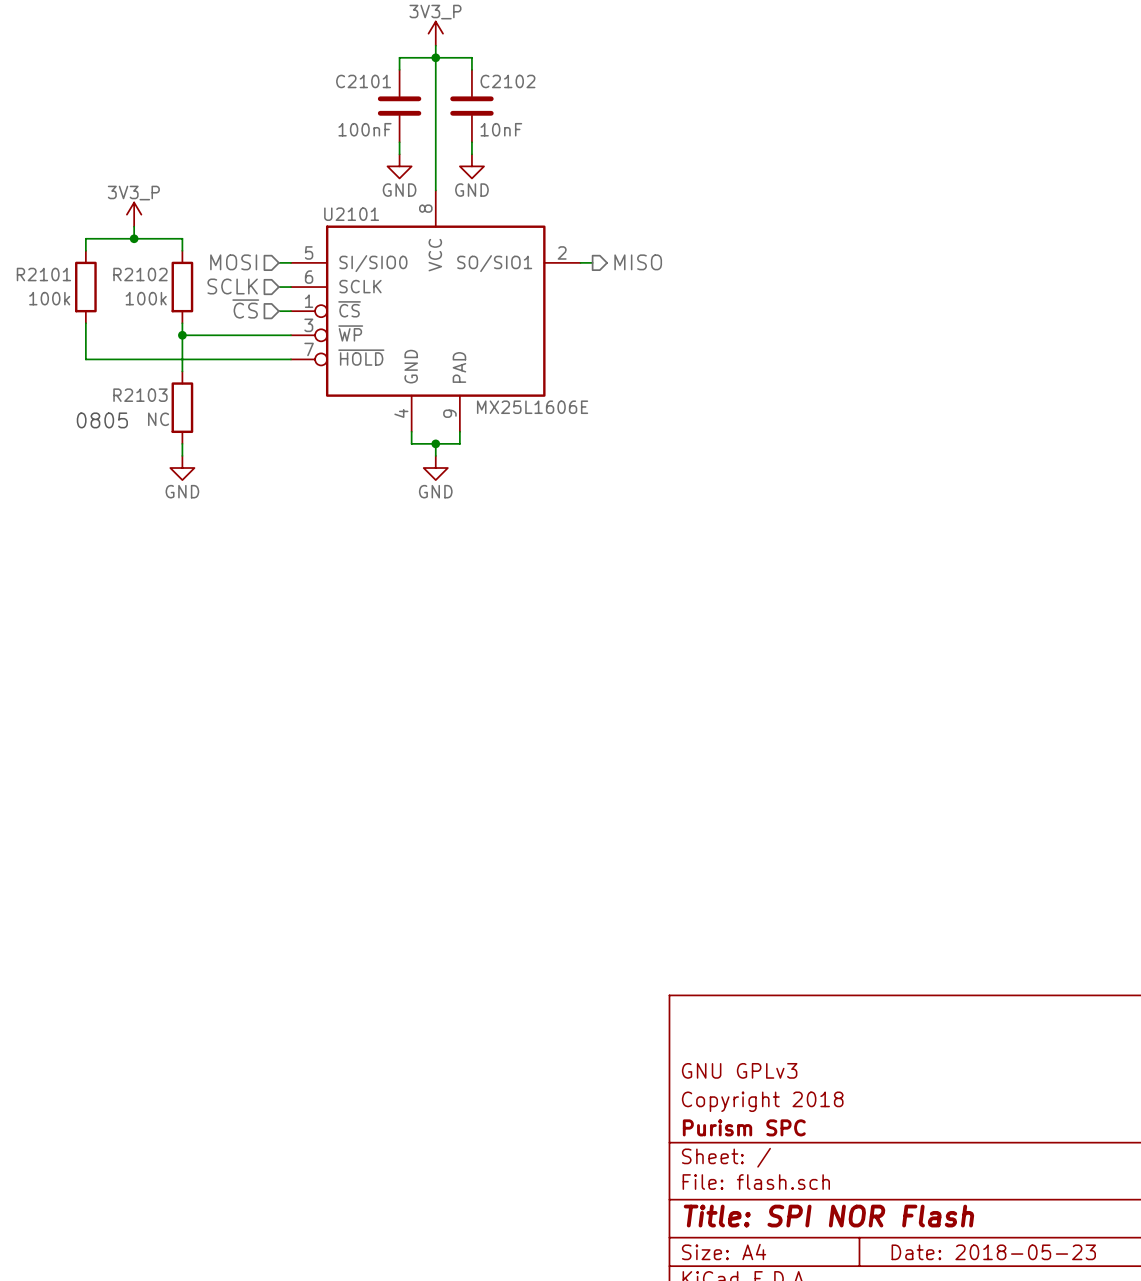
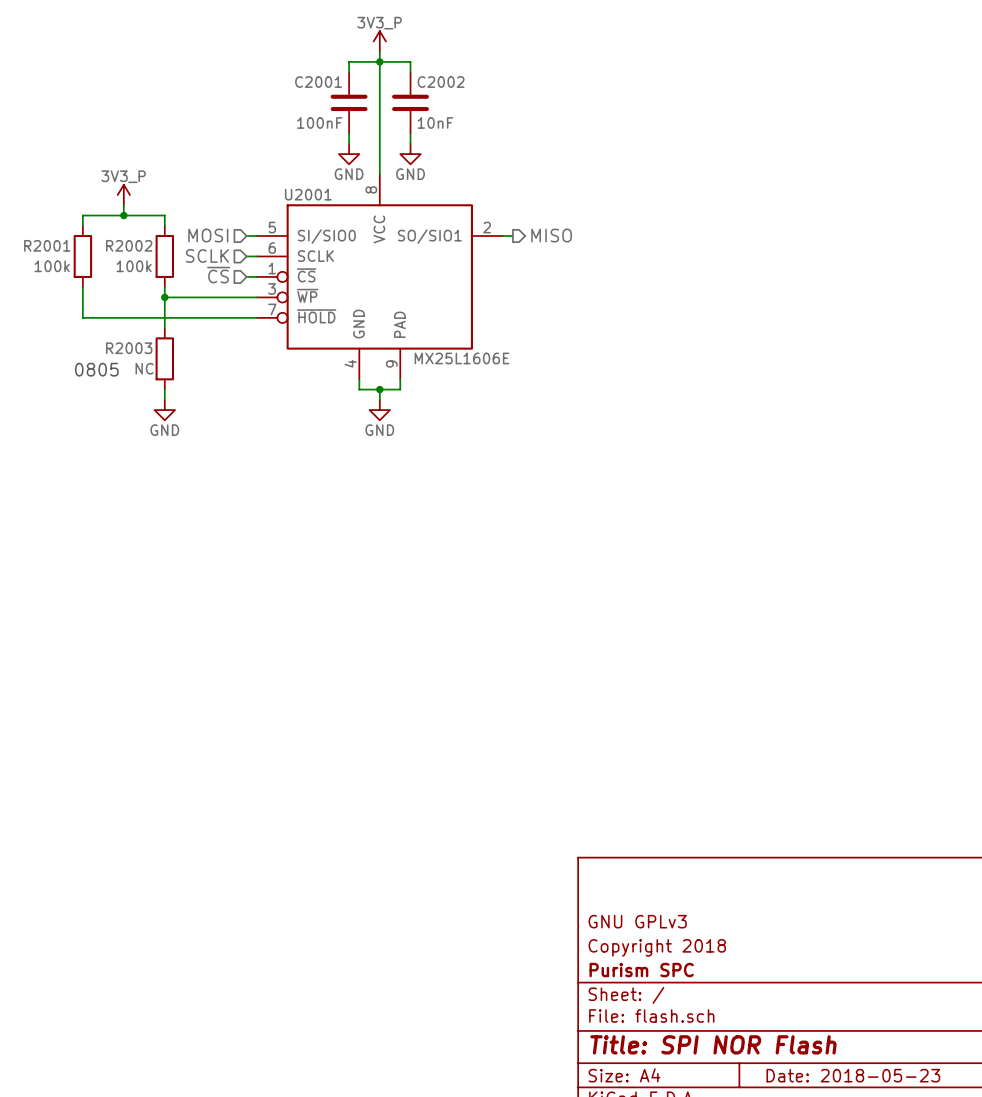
C2101 name: C2101 (363, 81) -> C2001 (318, 82)
C2102 name: C2102 (507, 81) -> C2002 (441, 82)
U2101 name: U2101 (351, 214) -> U2001 (308, 194)
R2101 name: R2101 (43, 274) -> R2001 (47, 245)
R2102 name: R2102 (140, 274) -> R2002 (129, 245)
R2103 name: R2103 (140, 395) -> R2003 (129, 348)

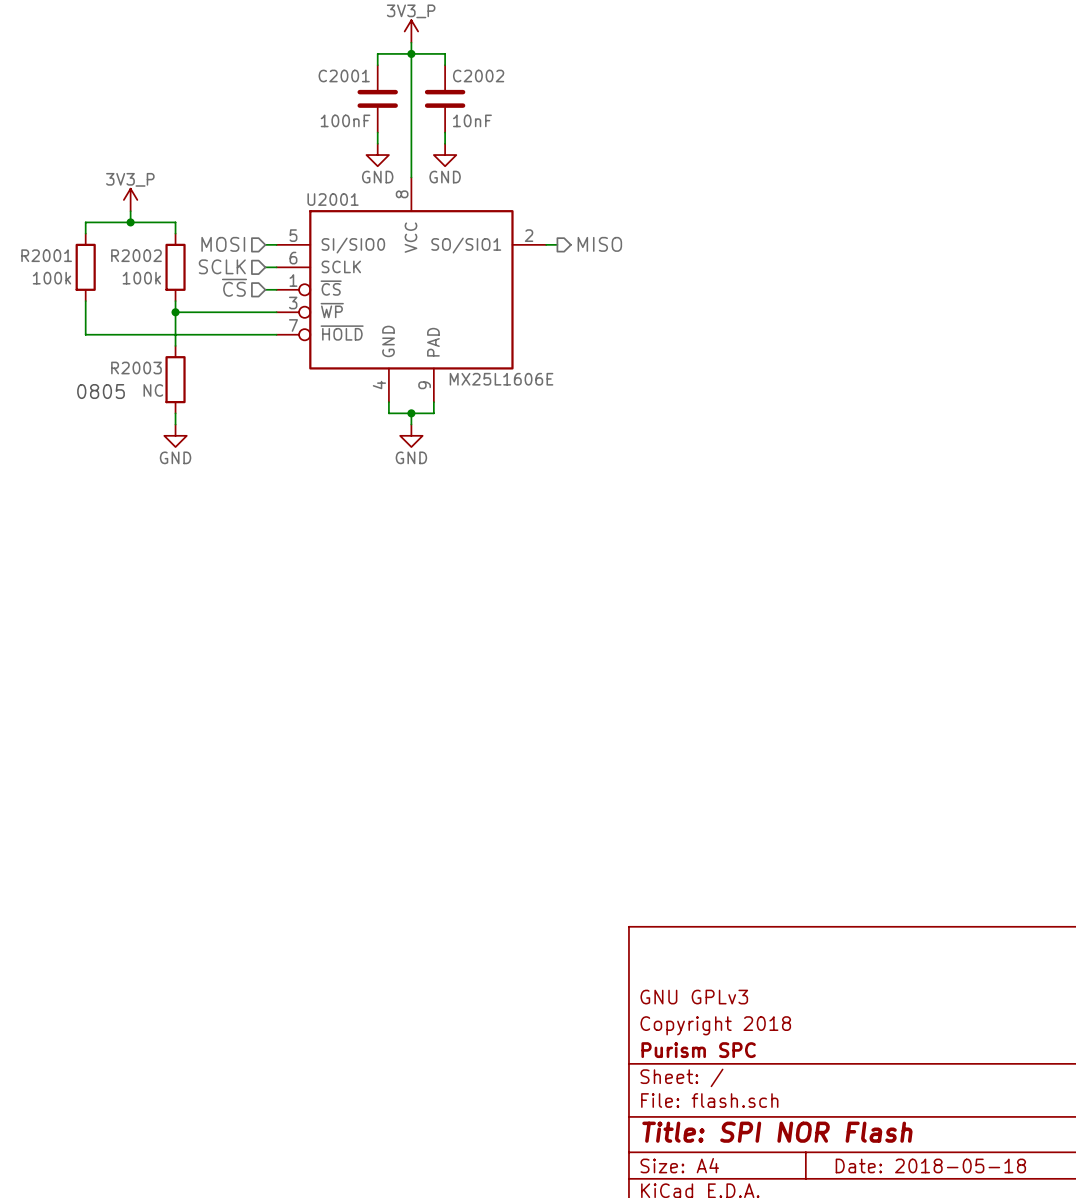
title block: Date: 2018-05-23 (853, 1075) -> Date: 2018-05-18 (930, 1165)

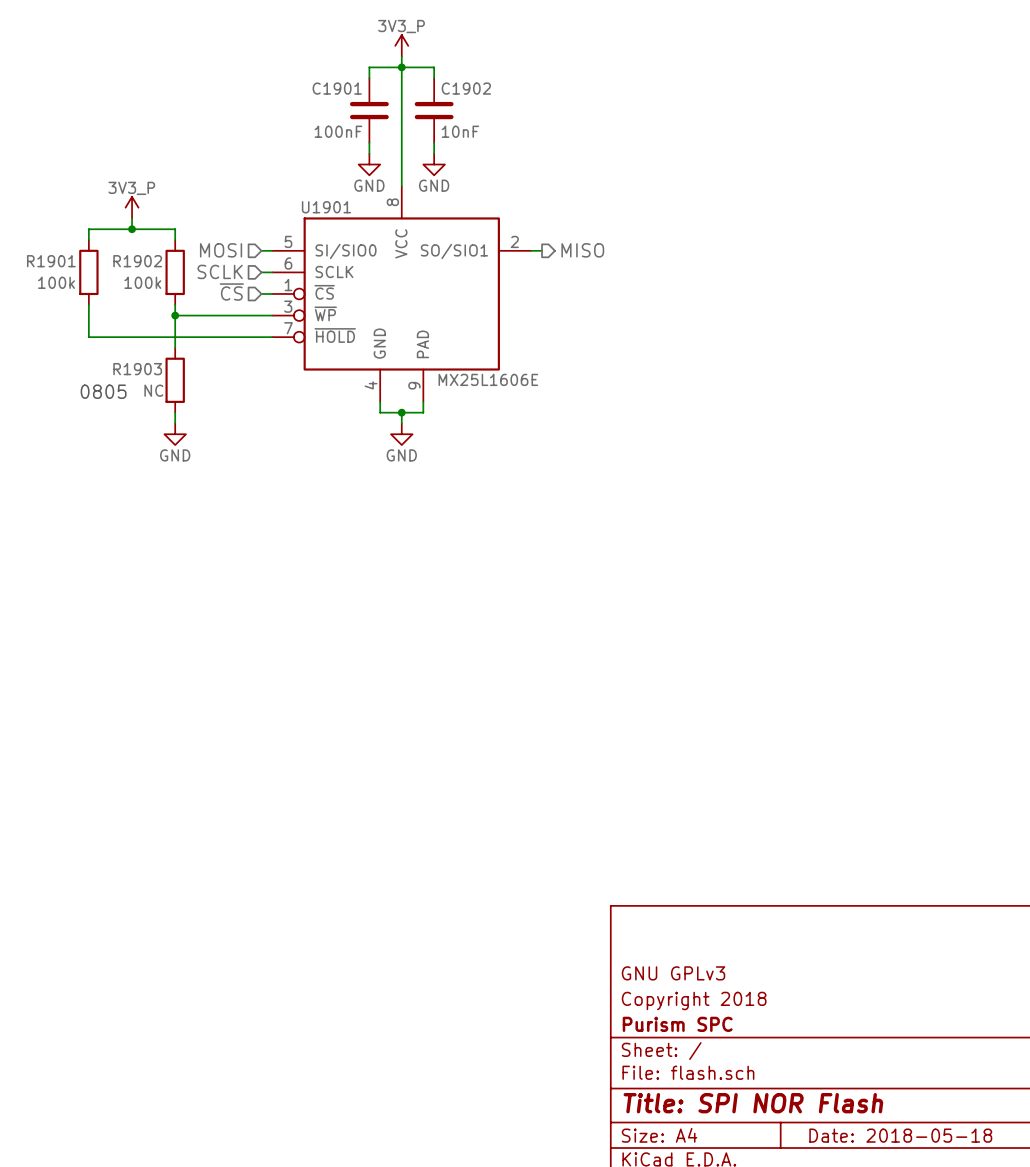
C2001 name: C2001 (344, 75) -> C1901 (337, 88)
C2002 name: C2002 (478, 75) -> C1902 (466, 88)
U2001 name: U2001 (333, 199) -> U1901 (326, 207)
R2001 name: R2001 (46, 255) -> R1901 (51, 261)
R2002 name: R2002 (136, 255) -> R1902 (137, 261)
R2003 name: R2003 (136, 368) -> R1903 (137, 369)

